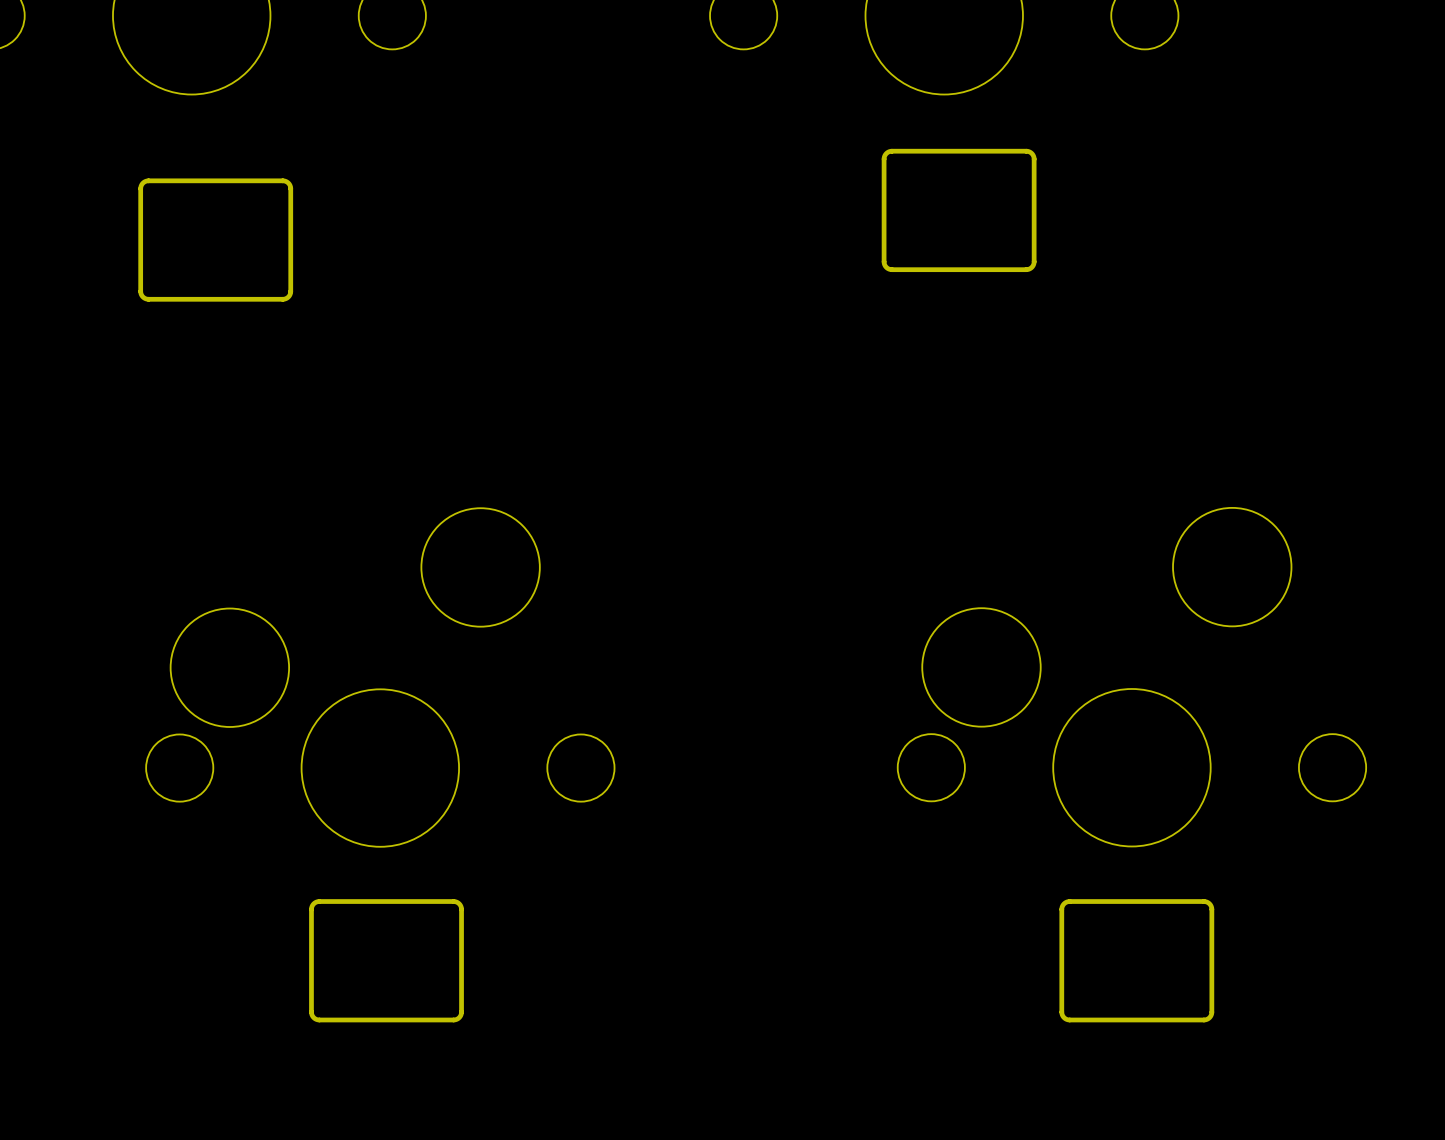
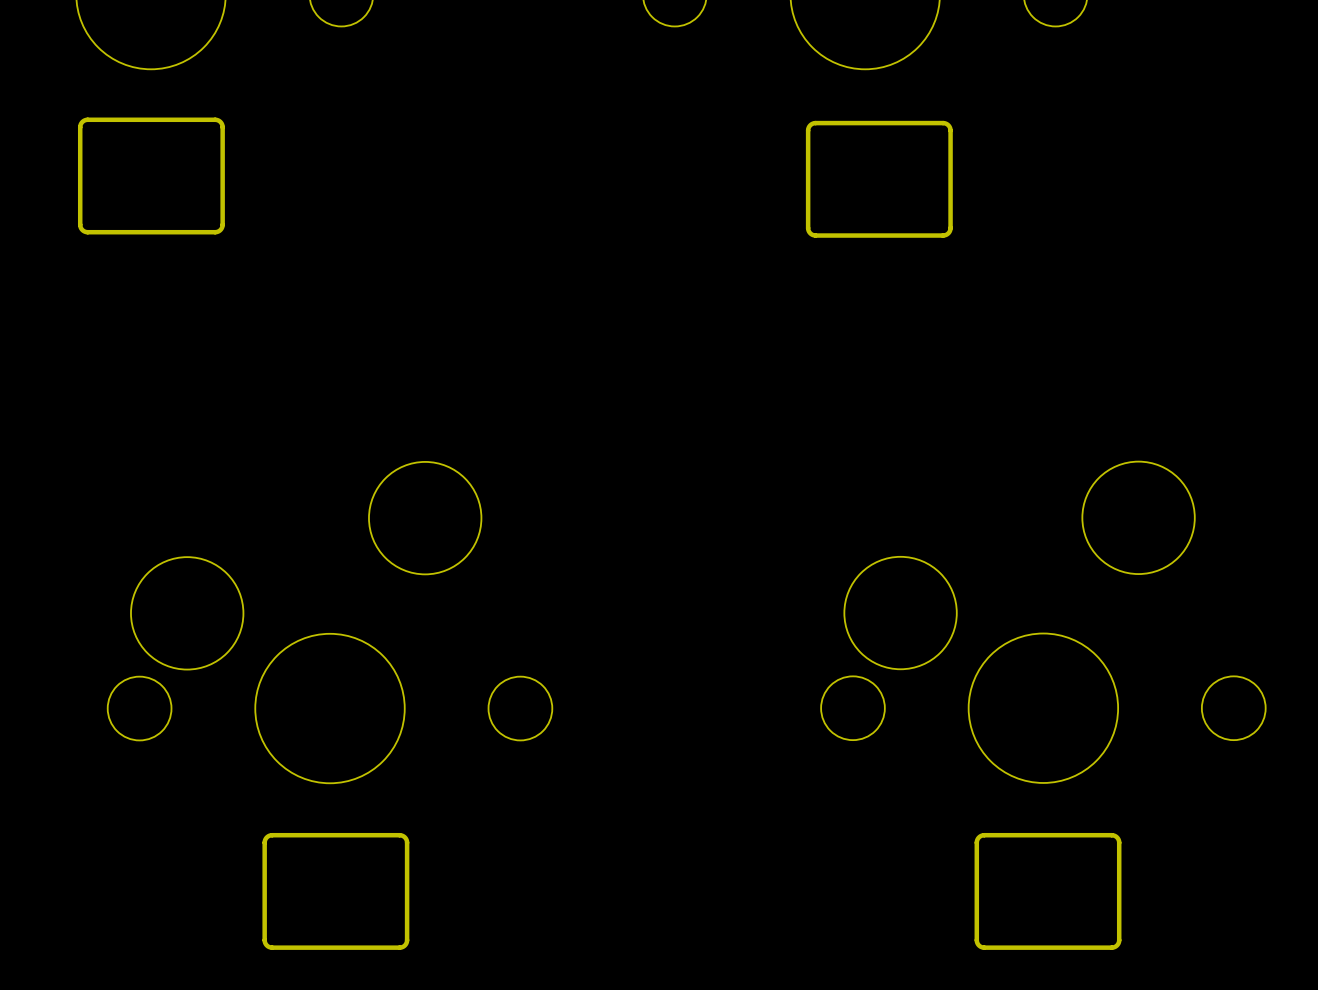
part position: (215, 240) -> (151, 175)

